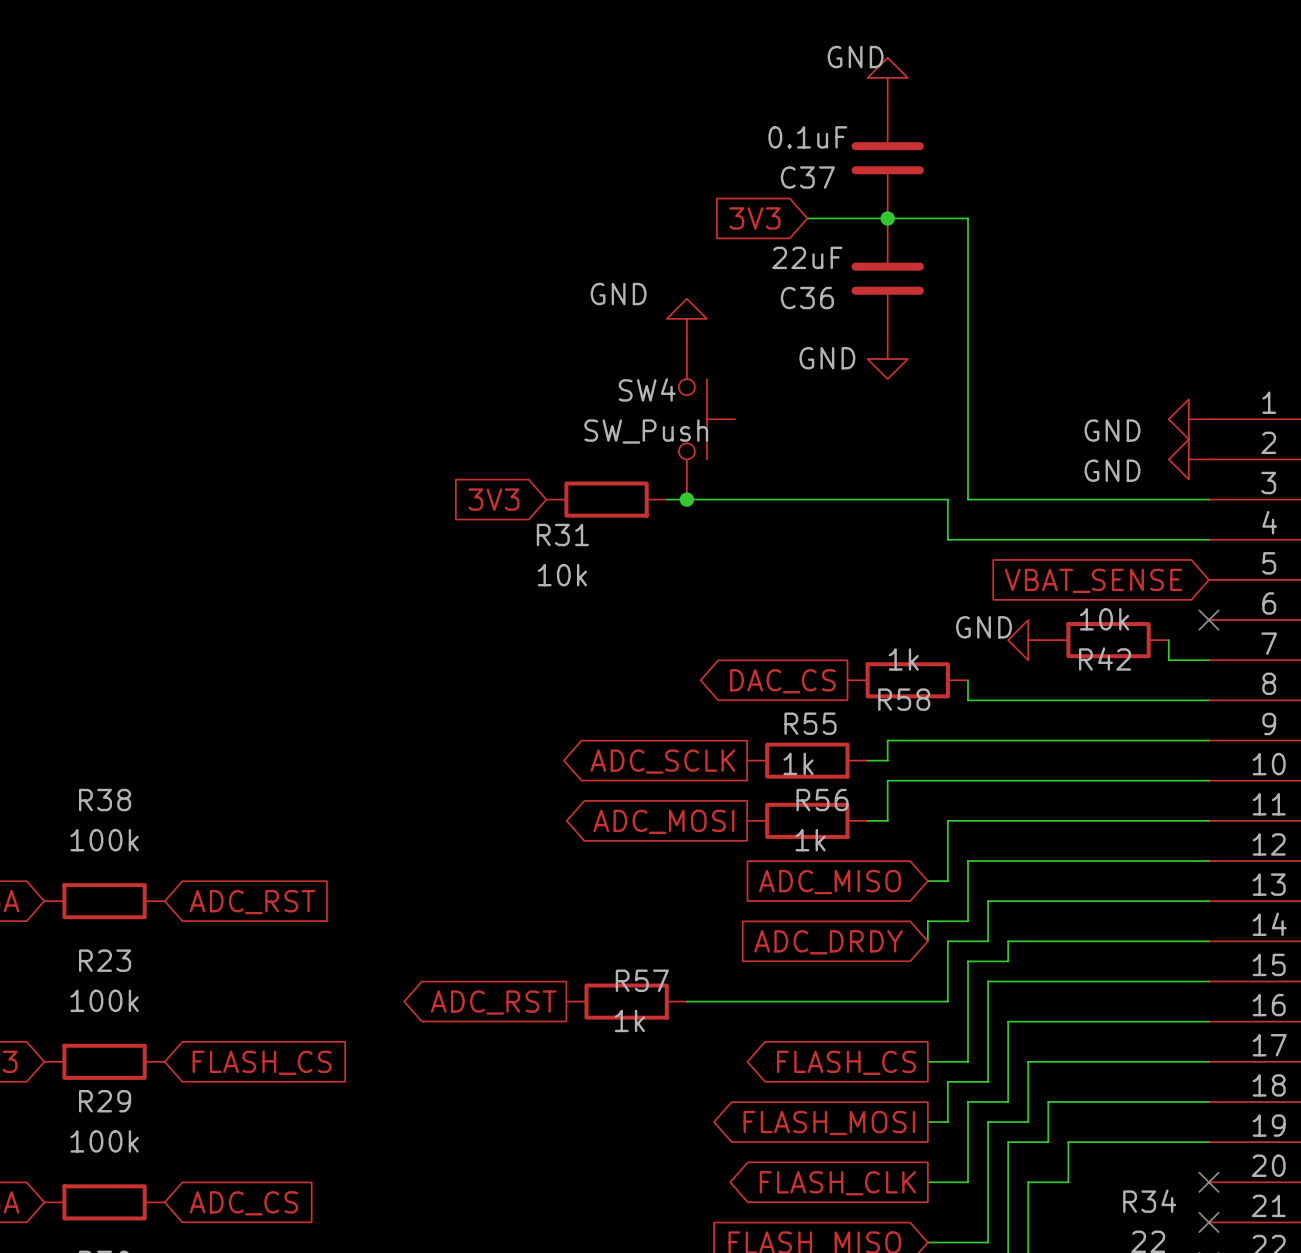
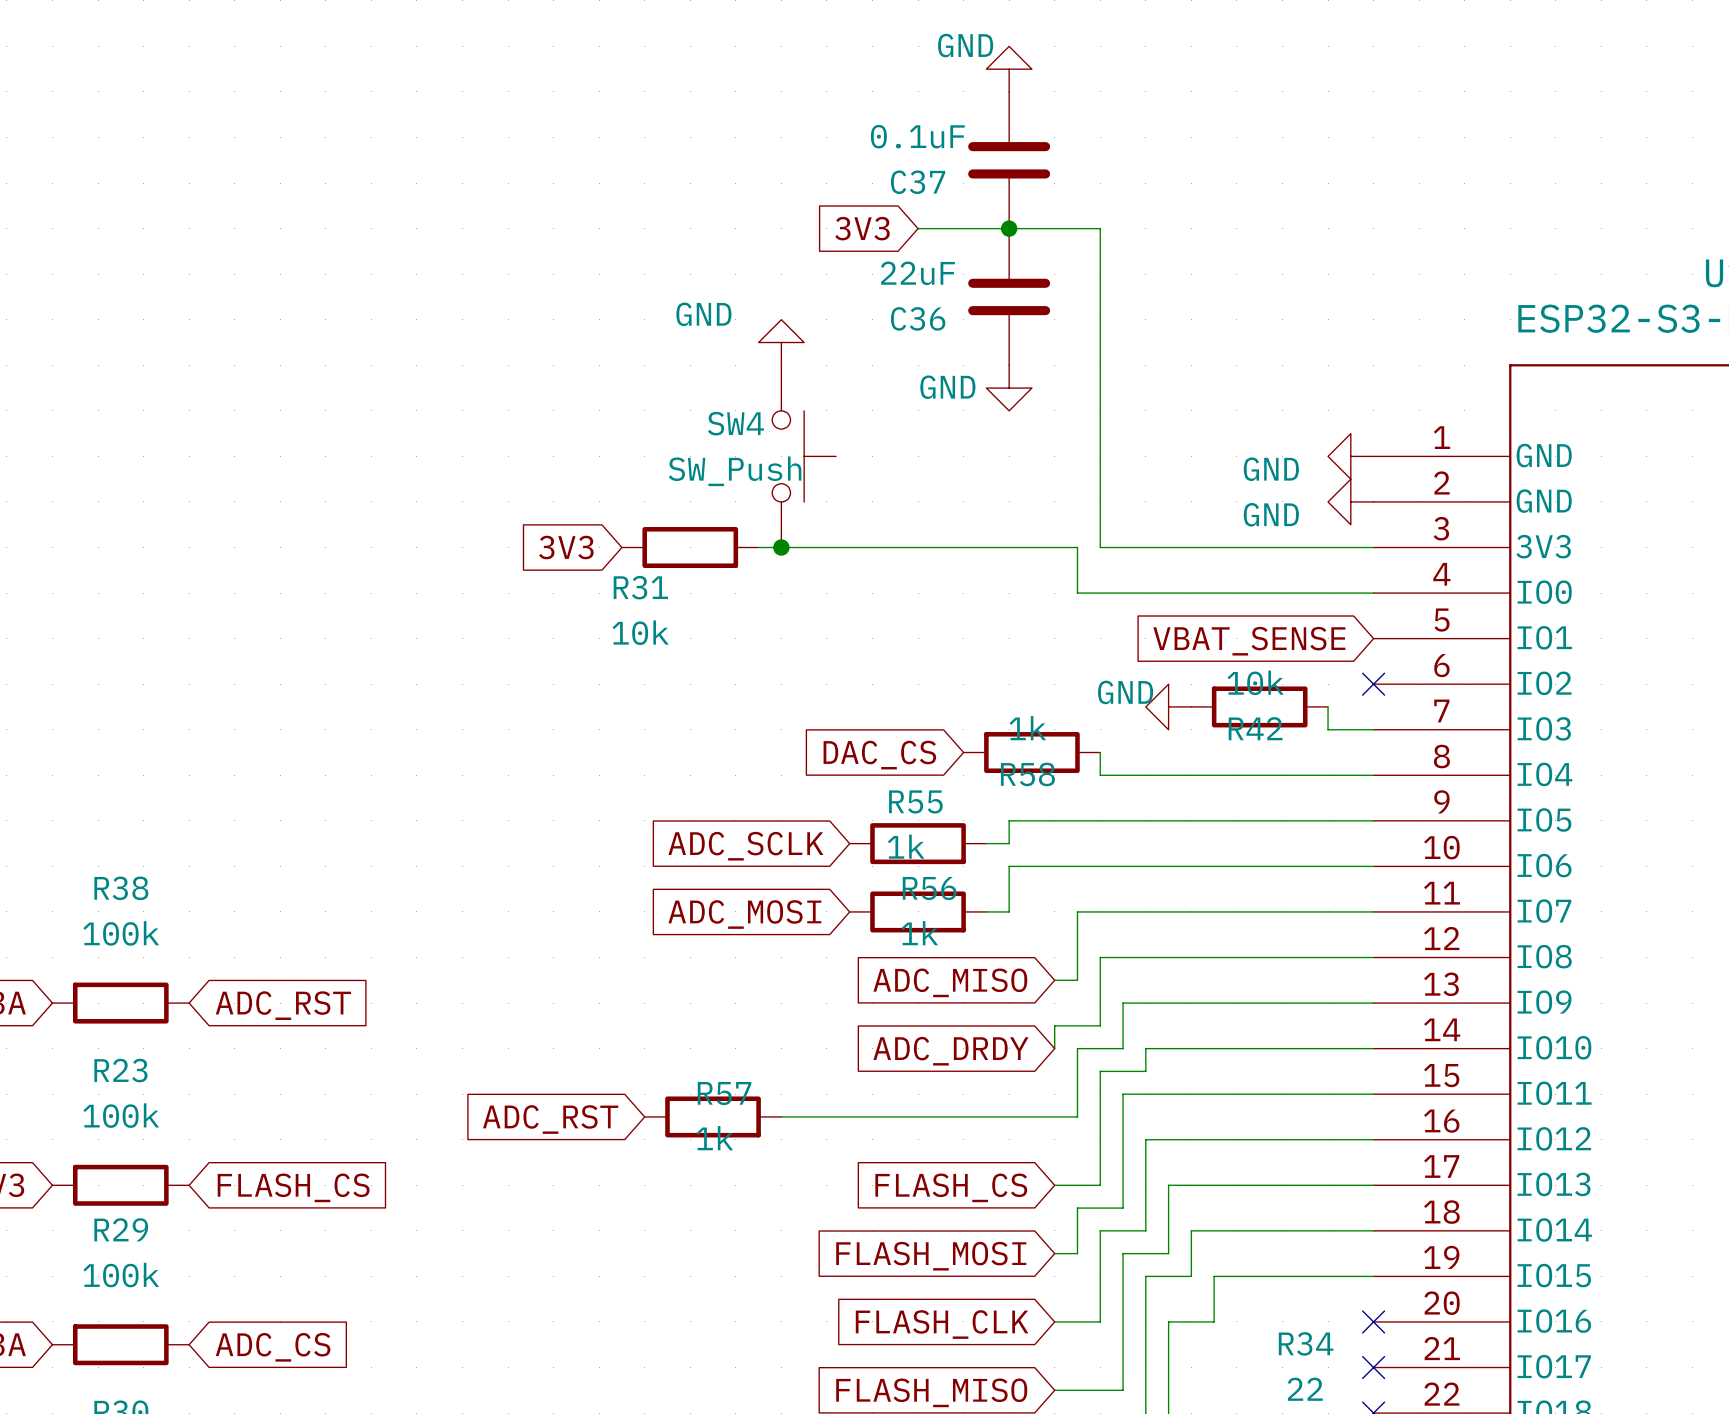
global label shape: output (782, 681) -> input (879, 755)
global label shape: output (662, 761) -> input (745, 846)
global label shape: output (663, 821) -> input (744, 914)
global label shape: output (493, 1002) -> input (550, 1119)
global label shape: output (846, 1062) -> input (951, 1187)
global label shape: output (829, 1123) -> input (931, 1256)
global label shape: output (837, 1183) -> input (942, 1324)

